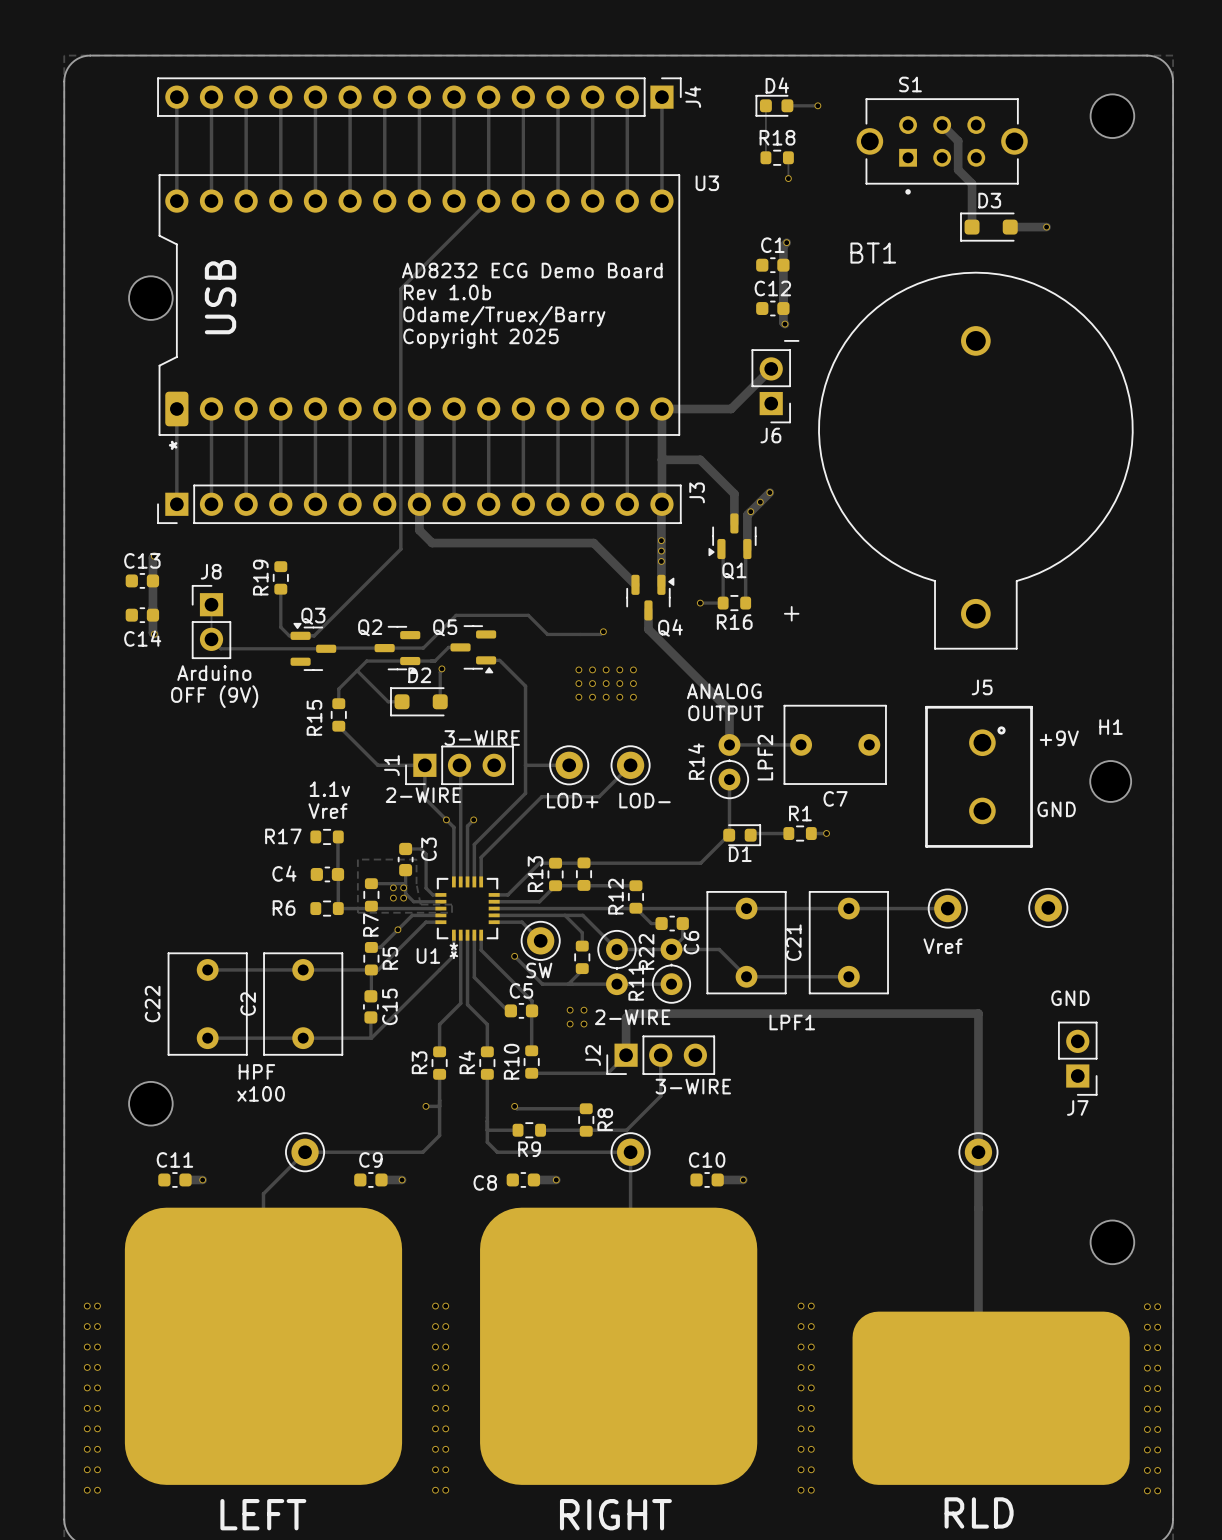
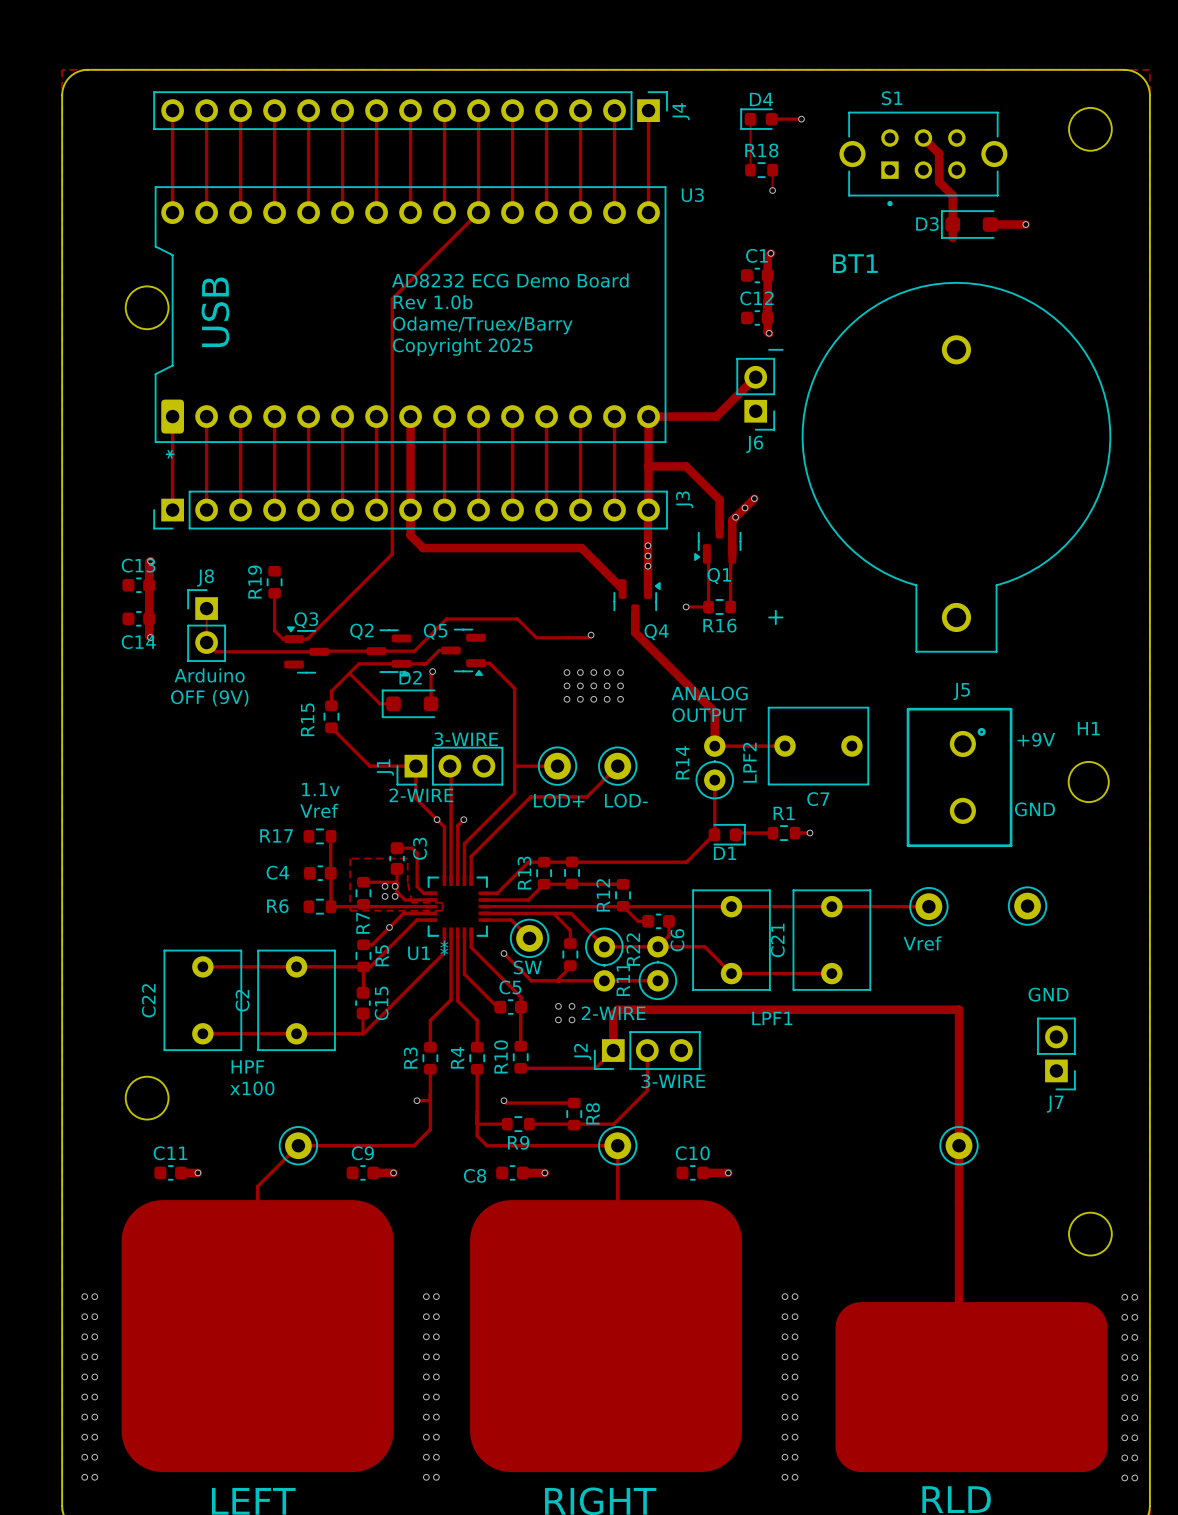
D3 name position: D3 (989, 200) -> D3 (927, 224)
D3 position: (988, 227) -> (969, 224)
track: (1010, 227) (1046, 227) -> (990, 224) (1025, 224)
via position: (1046, 227) -> (1025, 224)

